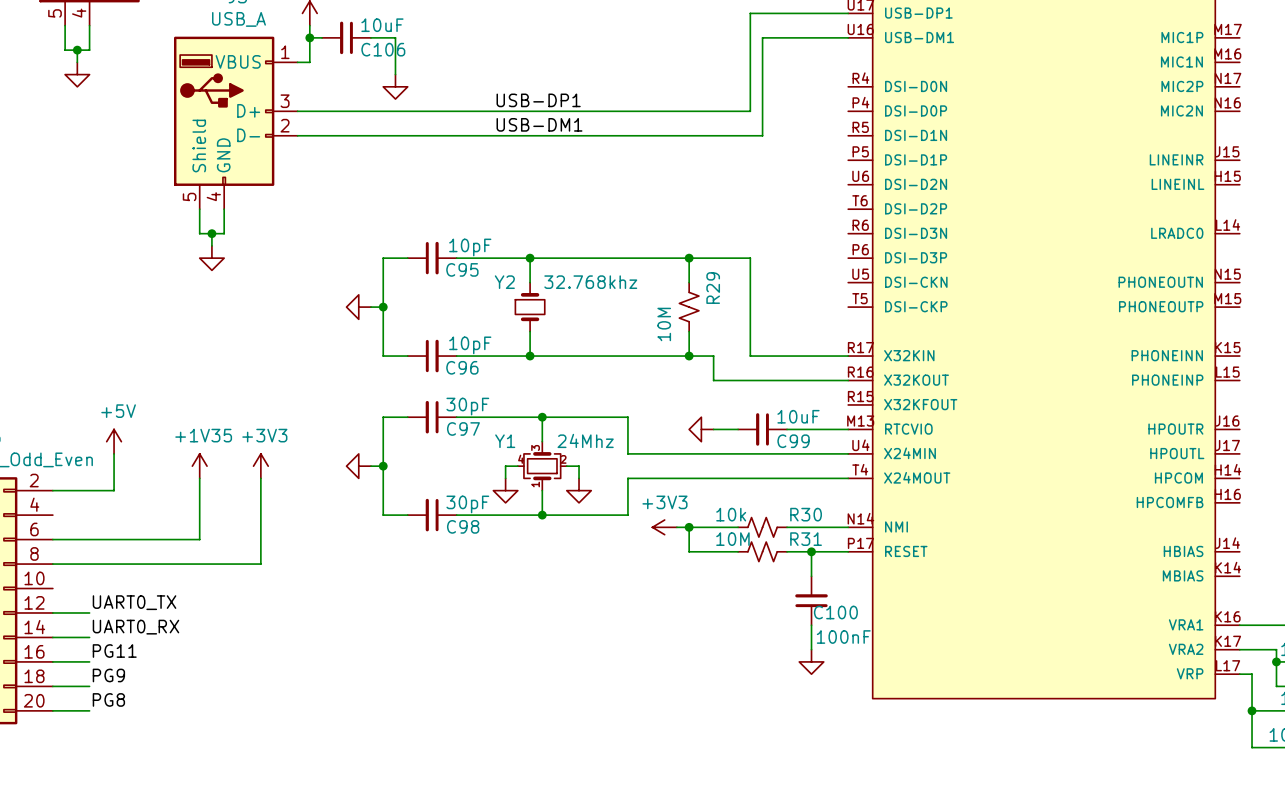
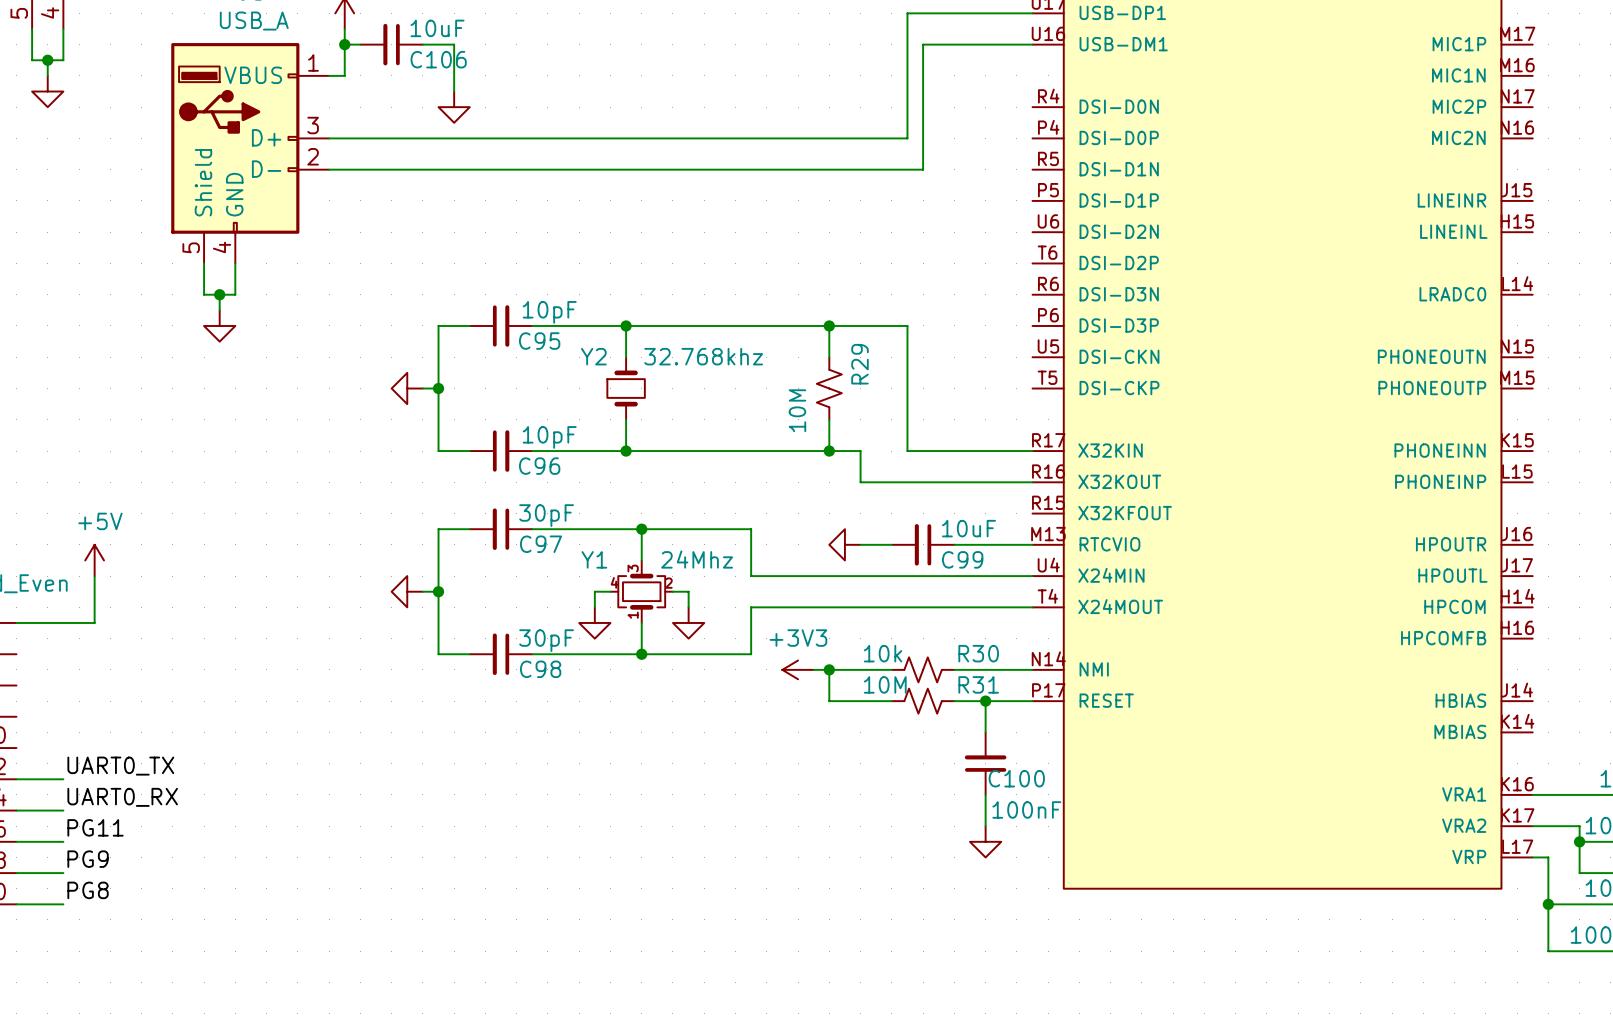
label: USB-DP1 (538, 100) -> none
label: USB-DM1 (539, 124) -> none
power symbol: +1V35 (199, 466) -> none
power symbol: +3V3 (260, 466) -> none
wire: (199, 478) (199, 539) (52, 539) -> none
wire: (260, 478) (260, 564) (52, 564) -> none

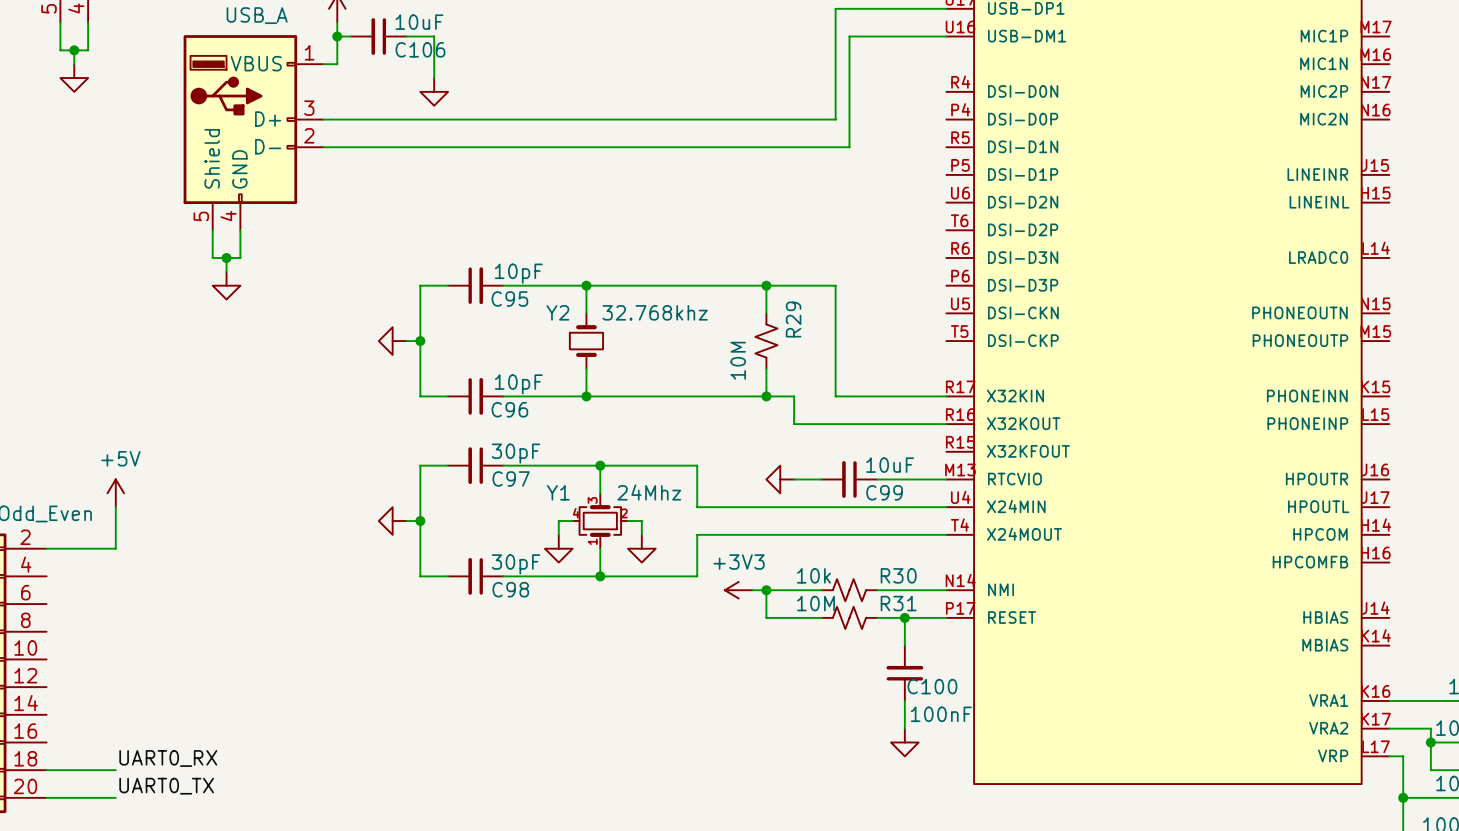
label position: UART0_TX (120, 766) -> UART0_TX (166, 786)
wire: (16, 779) (63, 779) -> none
label position: UART0_RX (122, 797) -> UART0_RX (168, 758)
wire: (16, 810) (63, 810) -> none
label: PG11 (95, 827) -> none
wire: (16, 841) (63, 841) -> none
label: PG9 (88, 859) -> none
wire: none -> (88, 770) (115, 770)
label: PG8 (88, 890) -> none
wire: none -> (88, 797) (115, 797)

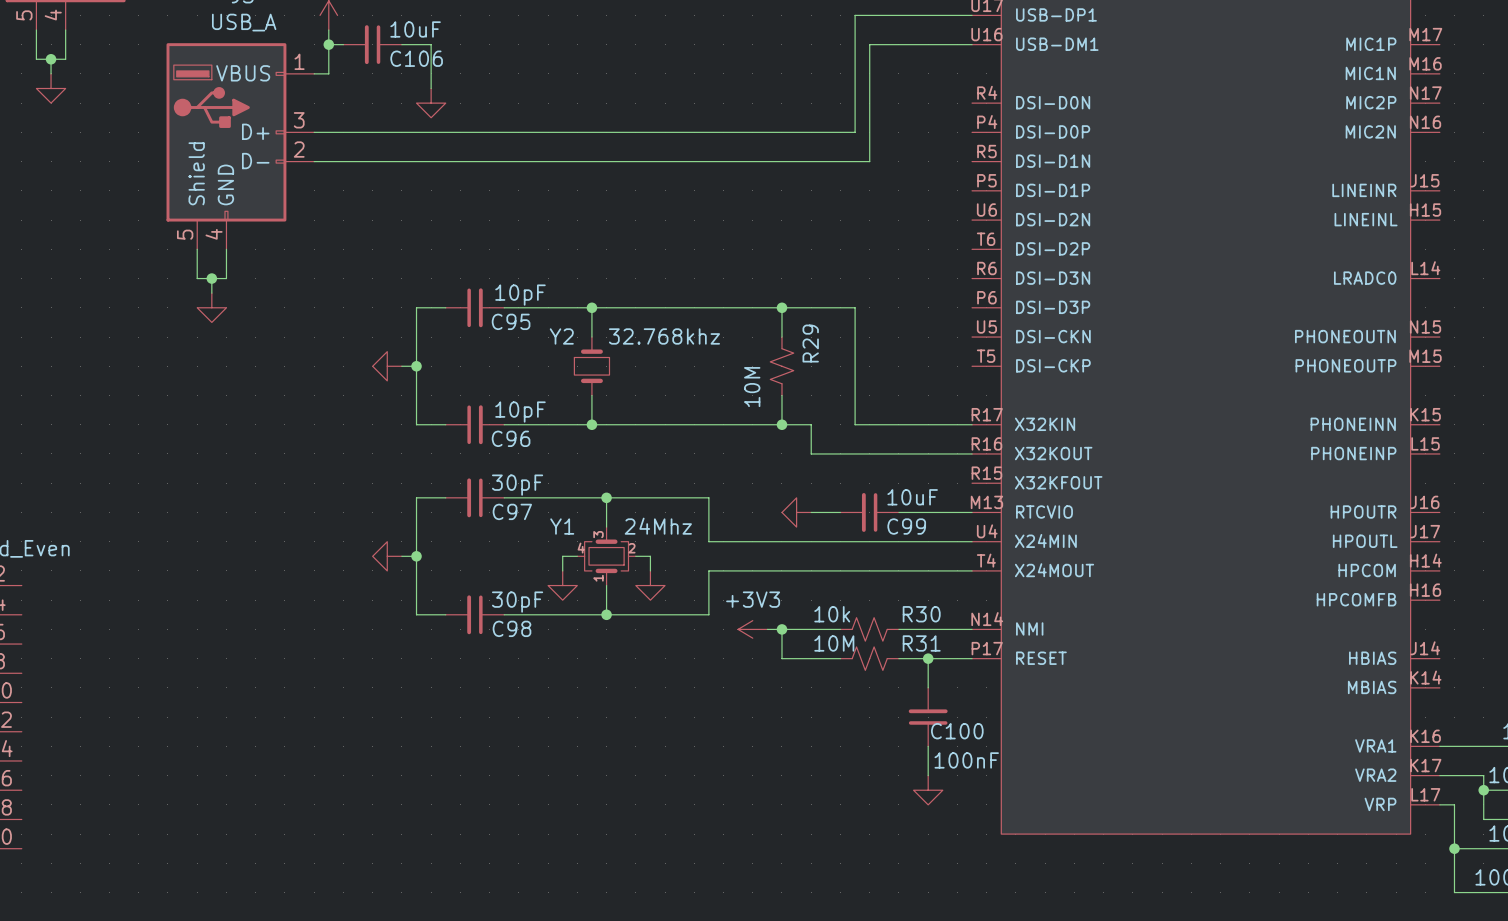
power symbol: +5V (115, 493) -> none
wire: (115, 507) (115, 548) (46, 548) -> none
label: UART0_RX (168, 758) -> none
wire: (46, 770) (115, 770) -> none
label: UART0_TX (166, 786) -> none
wire: (46, 797) (115, 797) -> none

